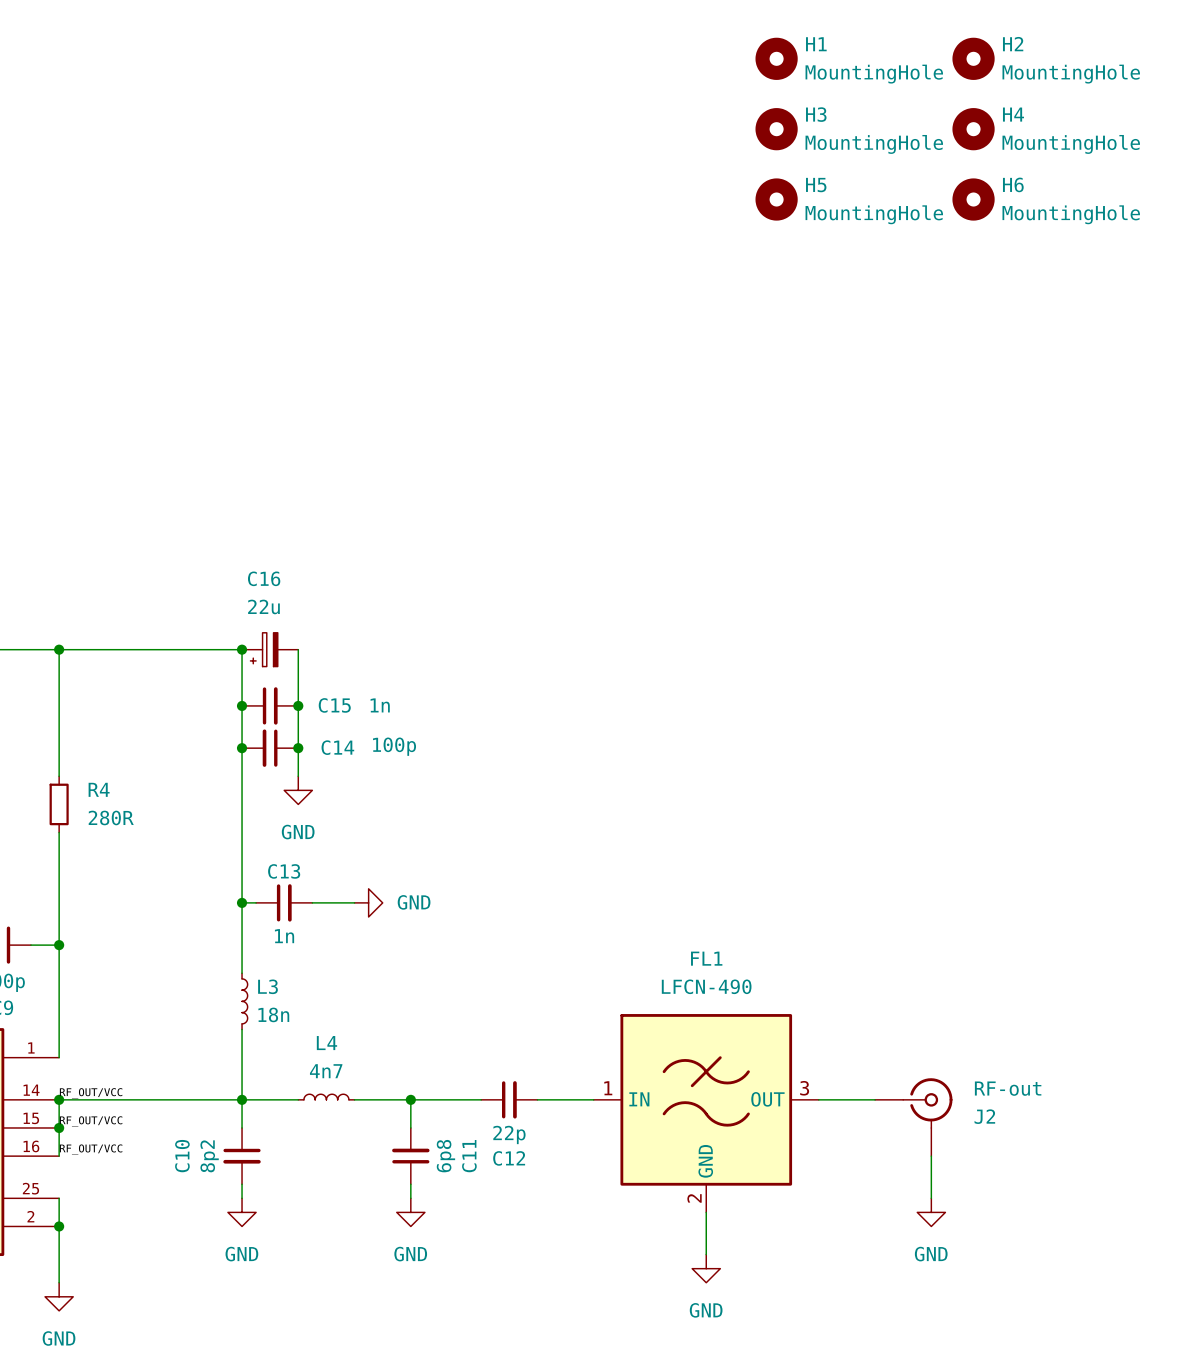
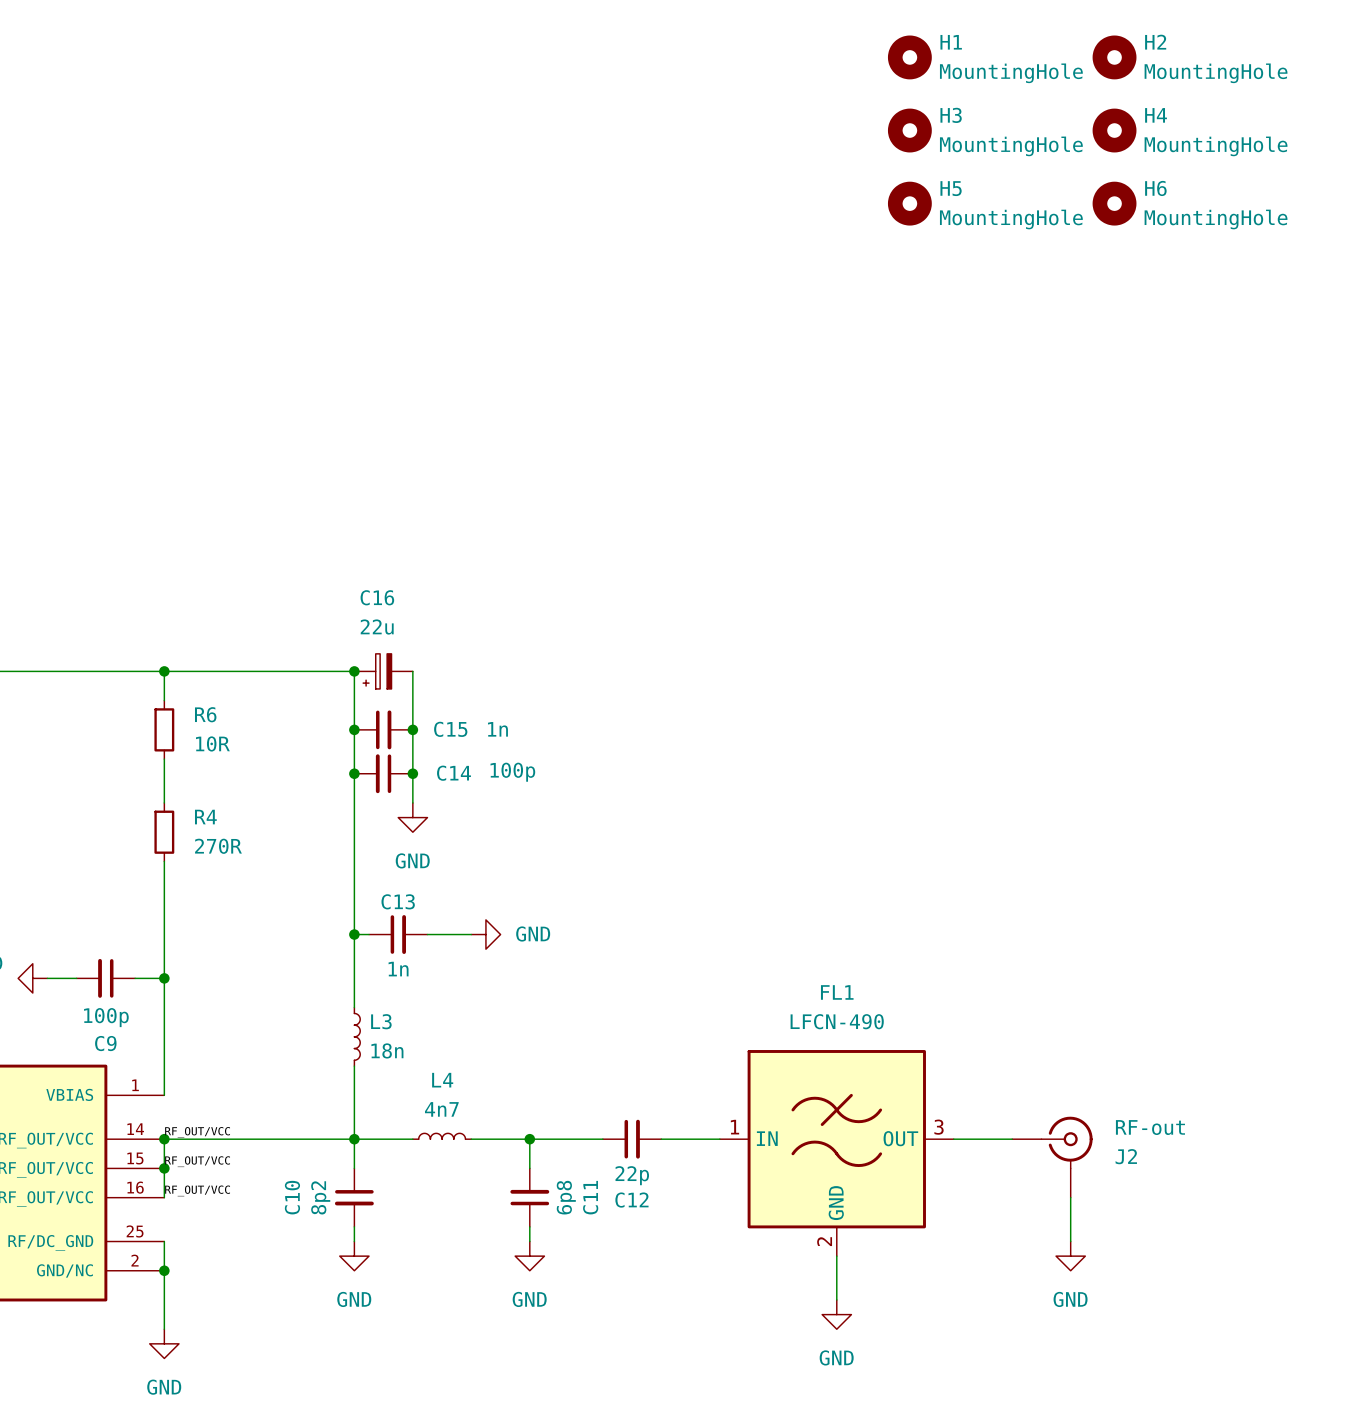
wire: (59, 677) (59, 734) -> none
R6: none -> 10R (164, 729)
R4 value: 280R (111, 817) -> 270R (218, 846)

